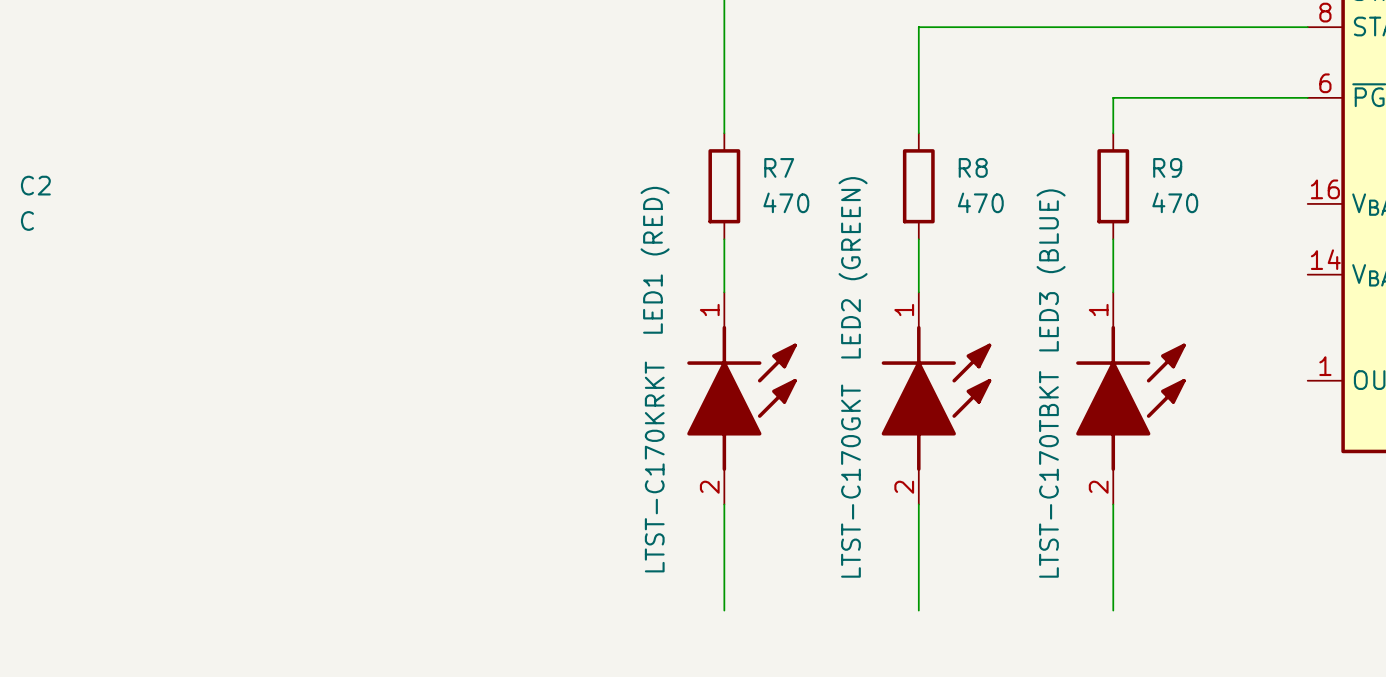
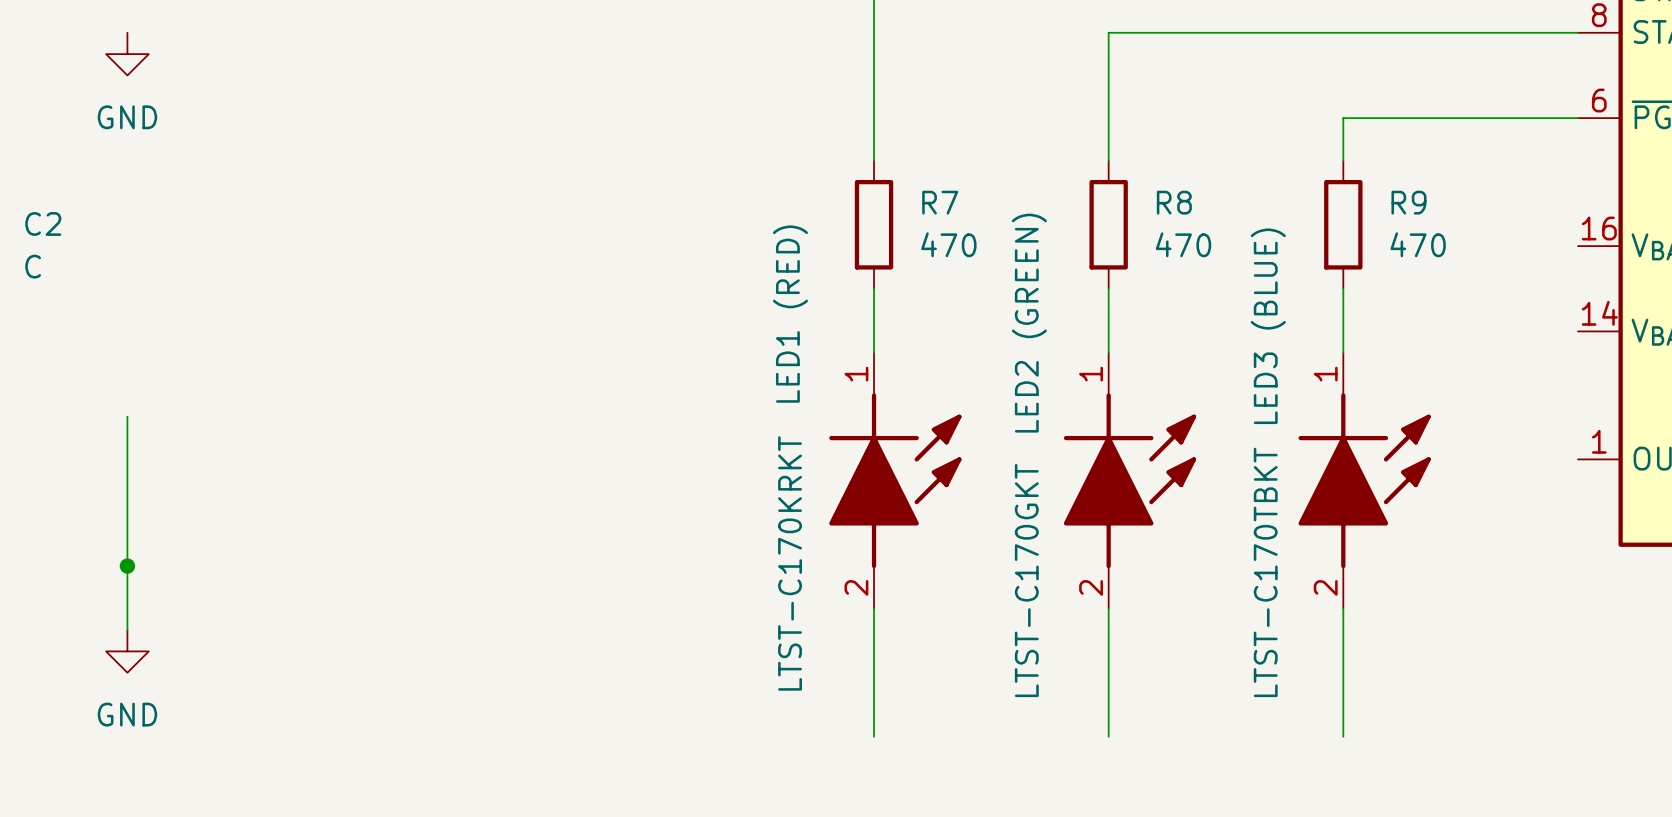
power symbol: none -> GND (127, 54)
wire: none -> (127, 416) (127, 630)
junction: none -> (127, 566)
power symbol: none -> GND (127, 651)

